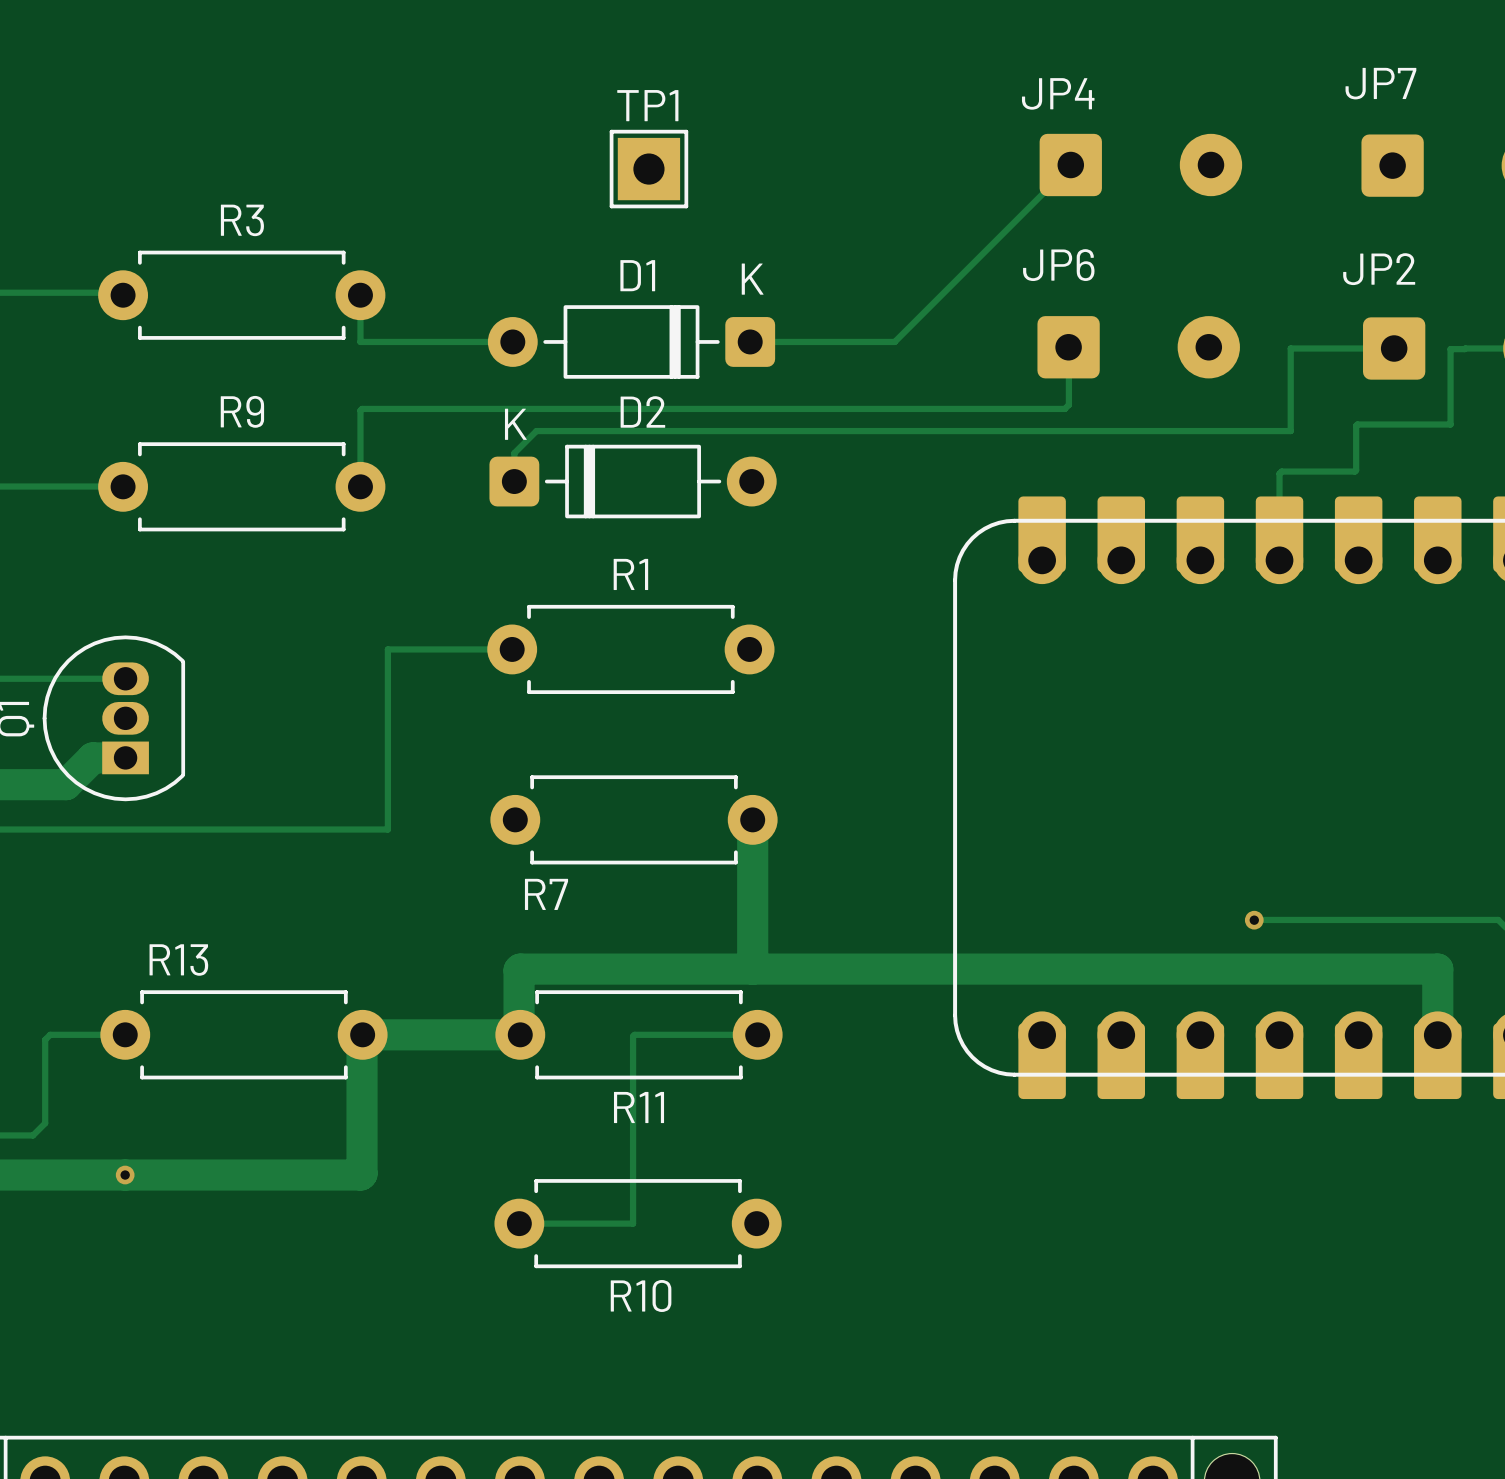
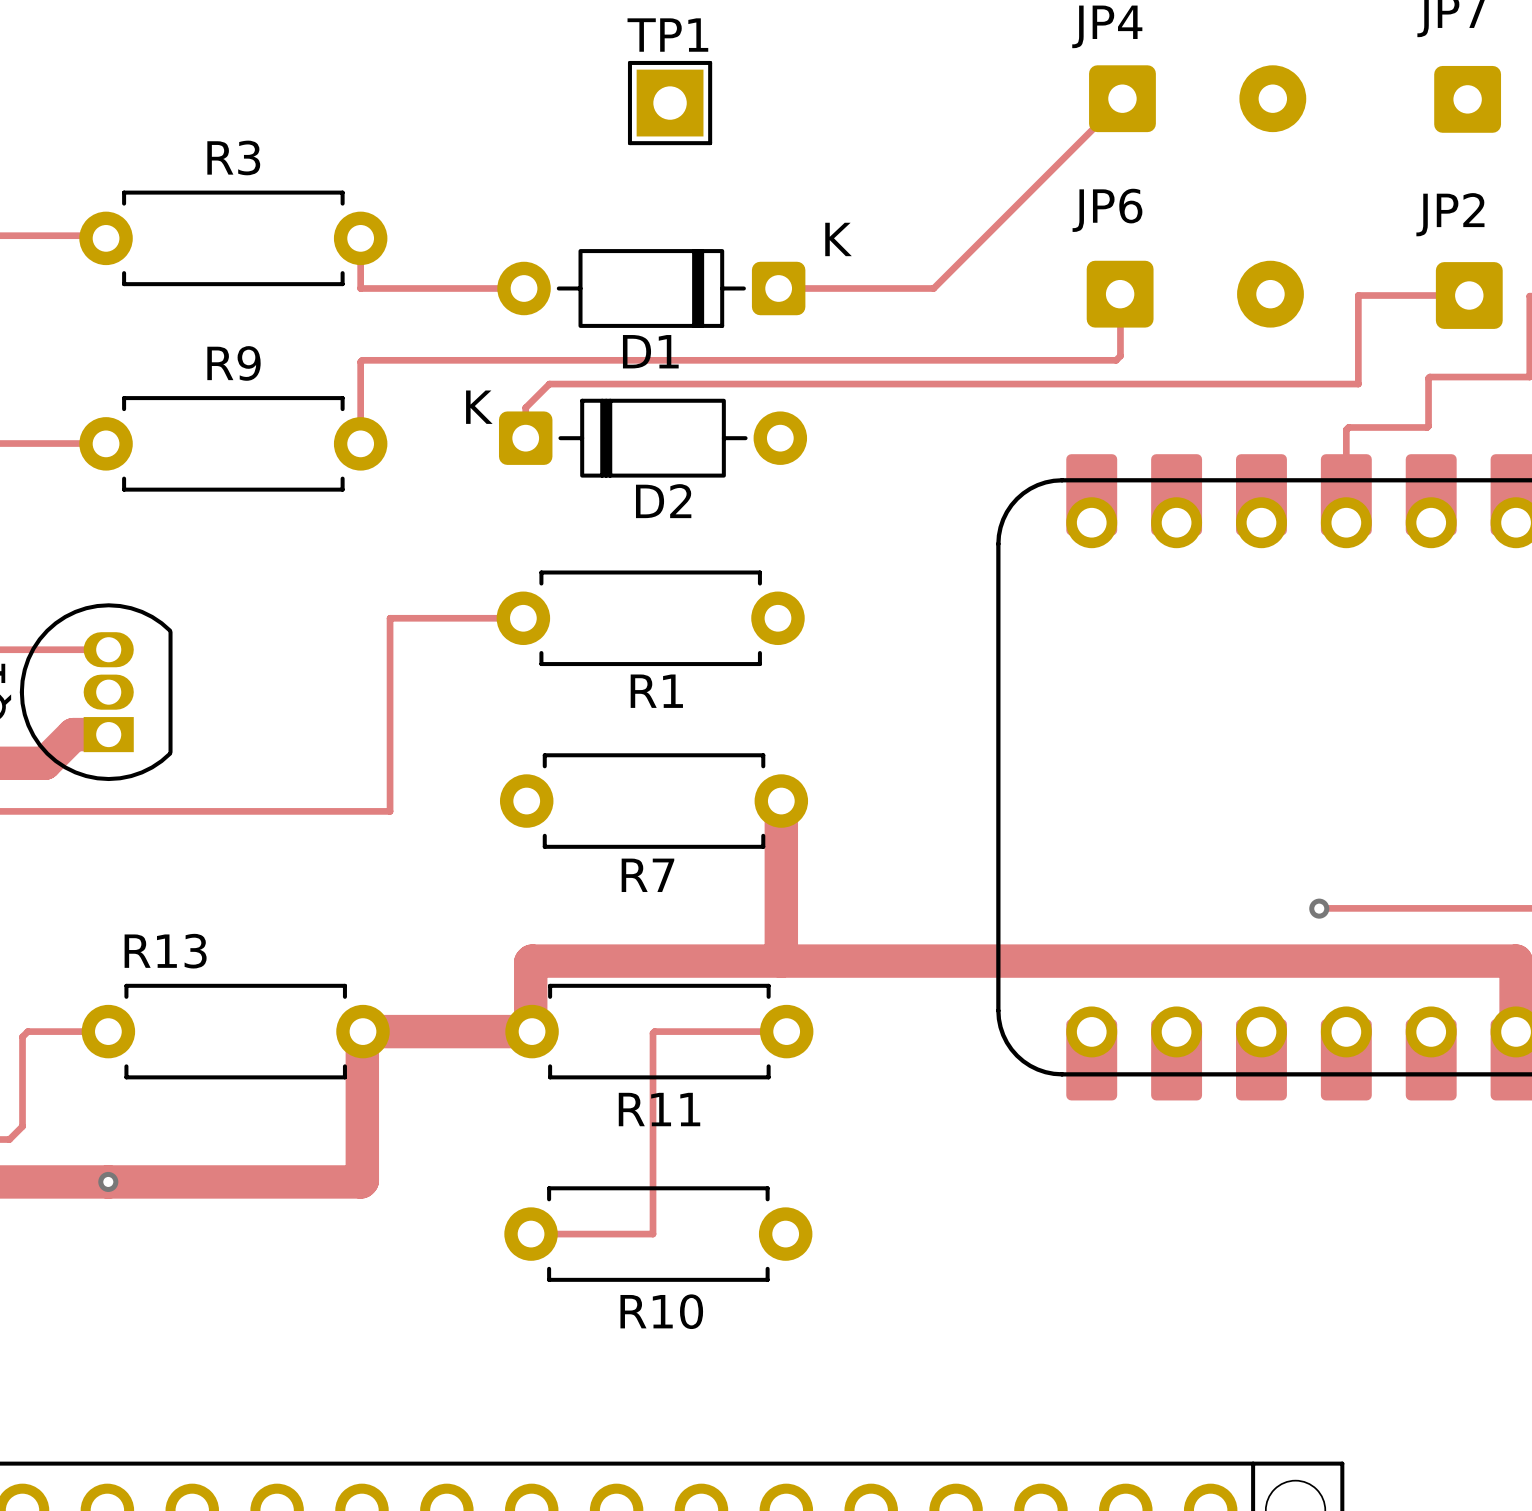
D1 name position: D1 (637, 275) -> D1 (650, 351)
D1 text position: K (752, 279) -> K (838, 239)
D2 name position: D2 (642, 411) -> D2 (663, 501)
D2 text position: K (515, 424) -> K (479, 407)
R1 name position: R1 (630, 574) -> R1 (656, 691)
R7 name position: R7 (546, 894) -> R7 (647, 875)

